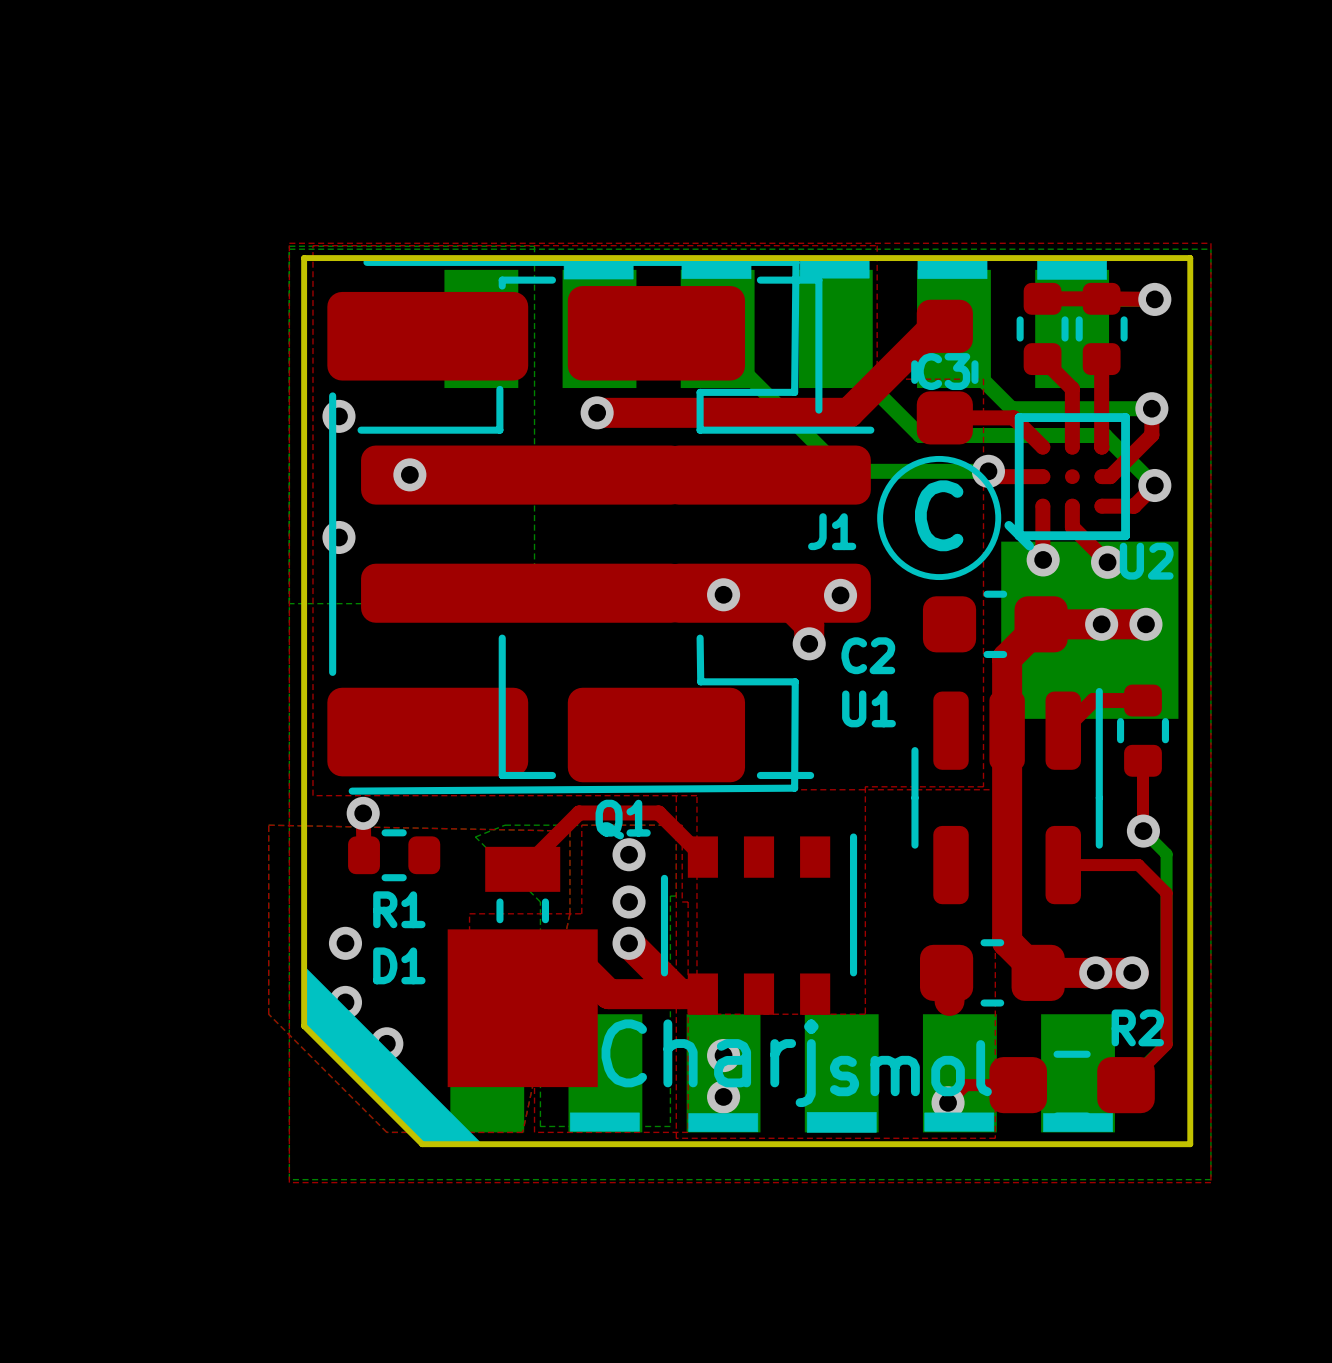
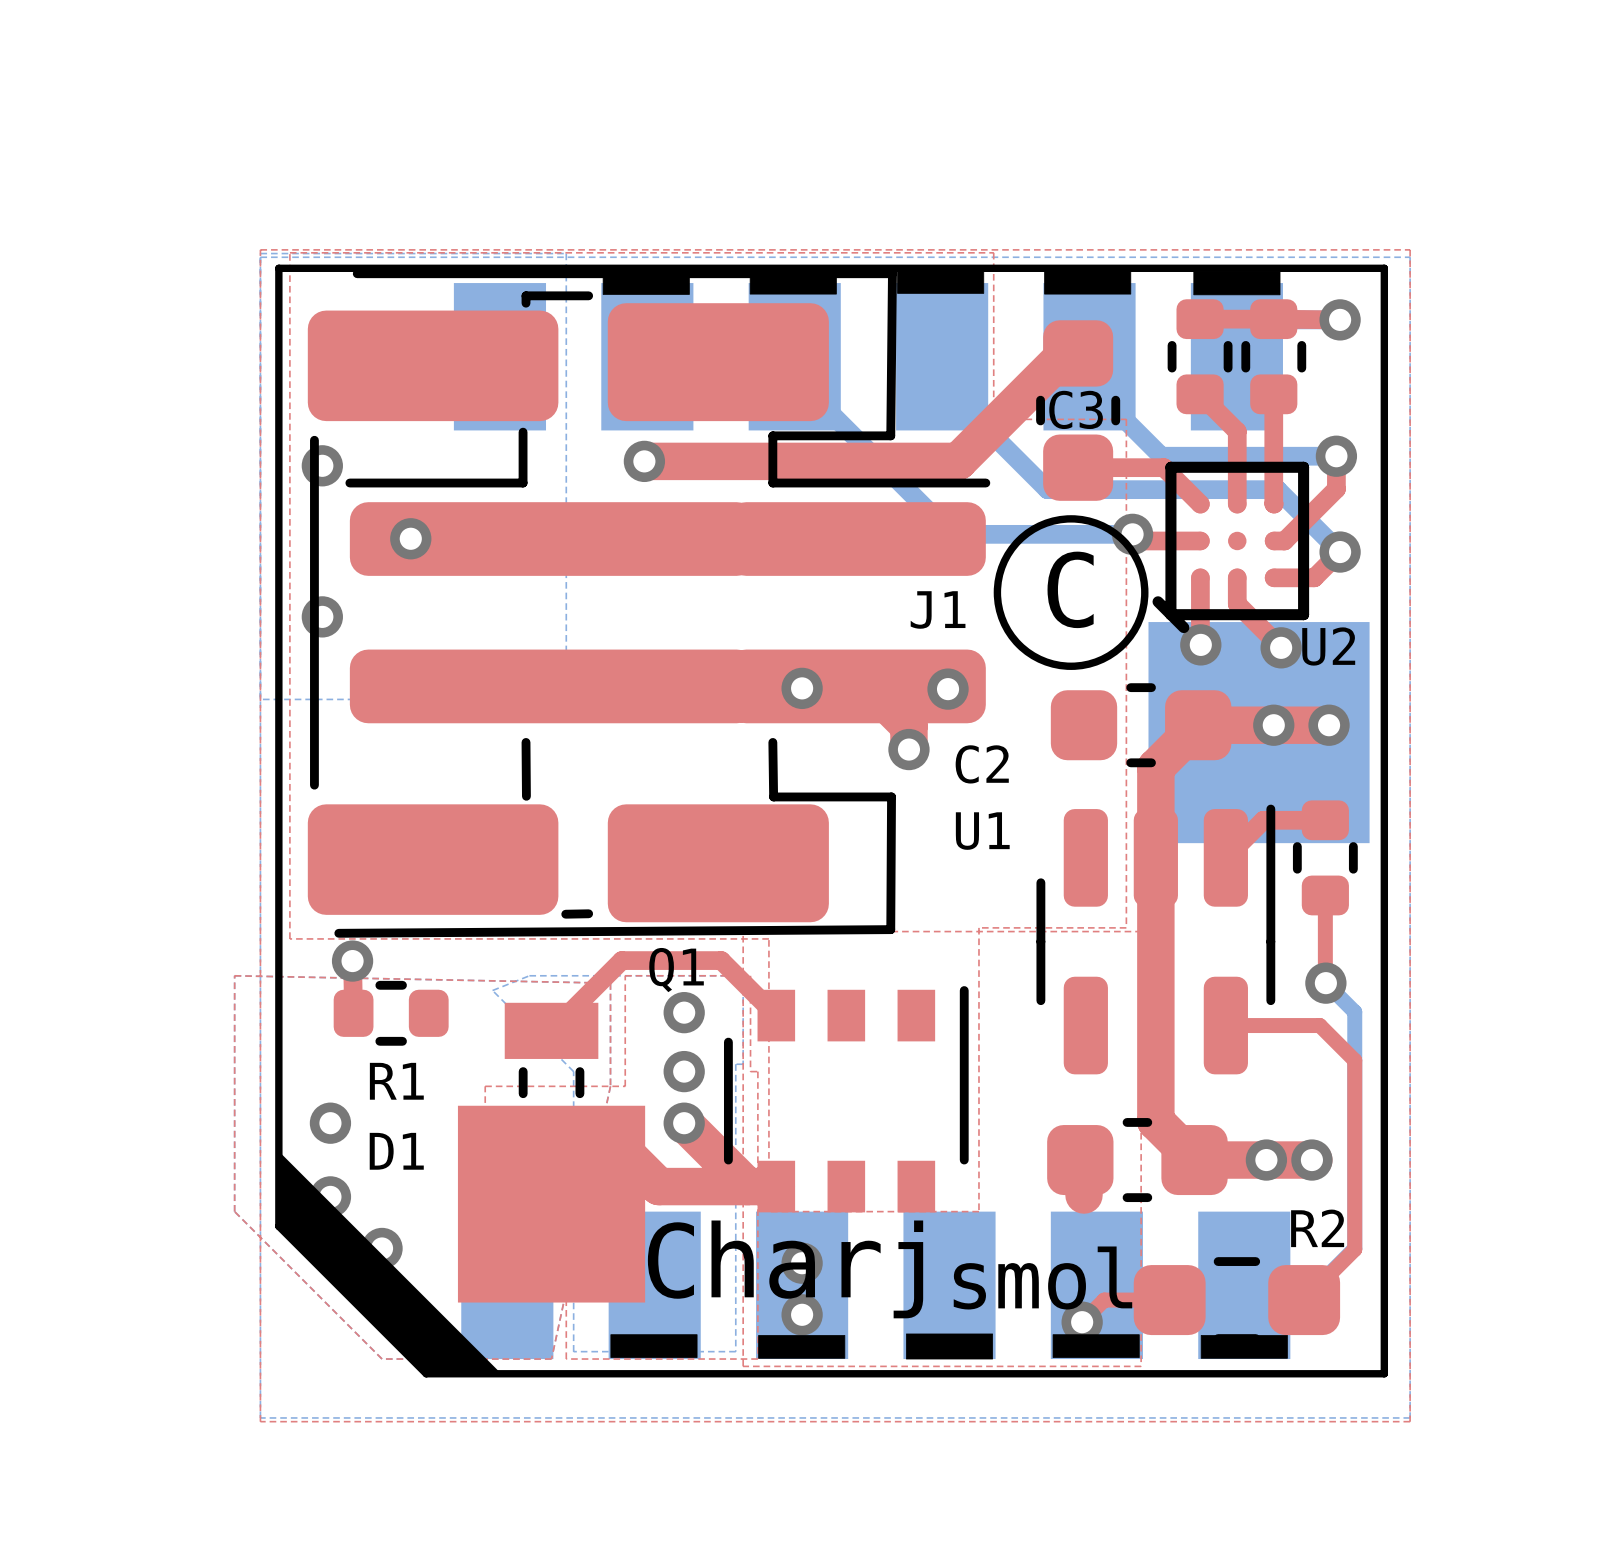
J1 footprint: [327, 258, 875, 795] -> [307, 269, 991, 938]

